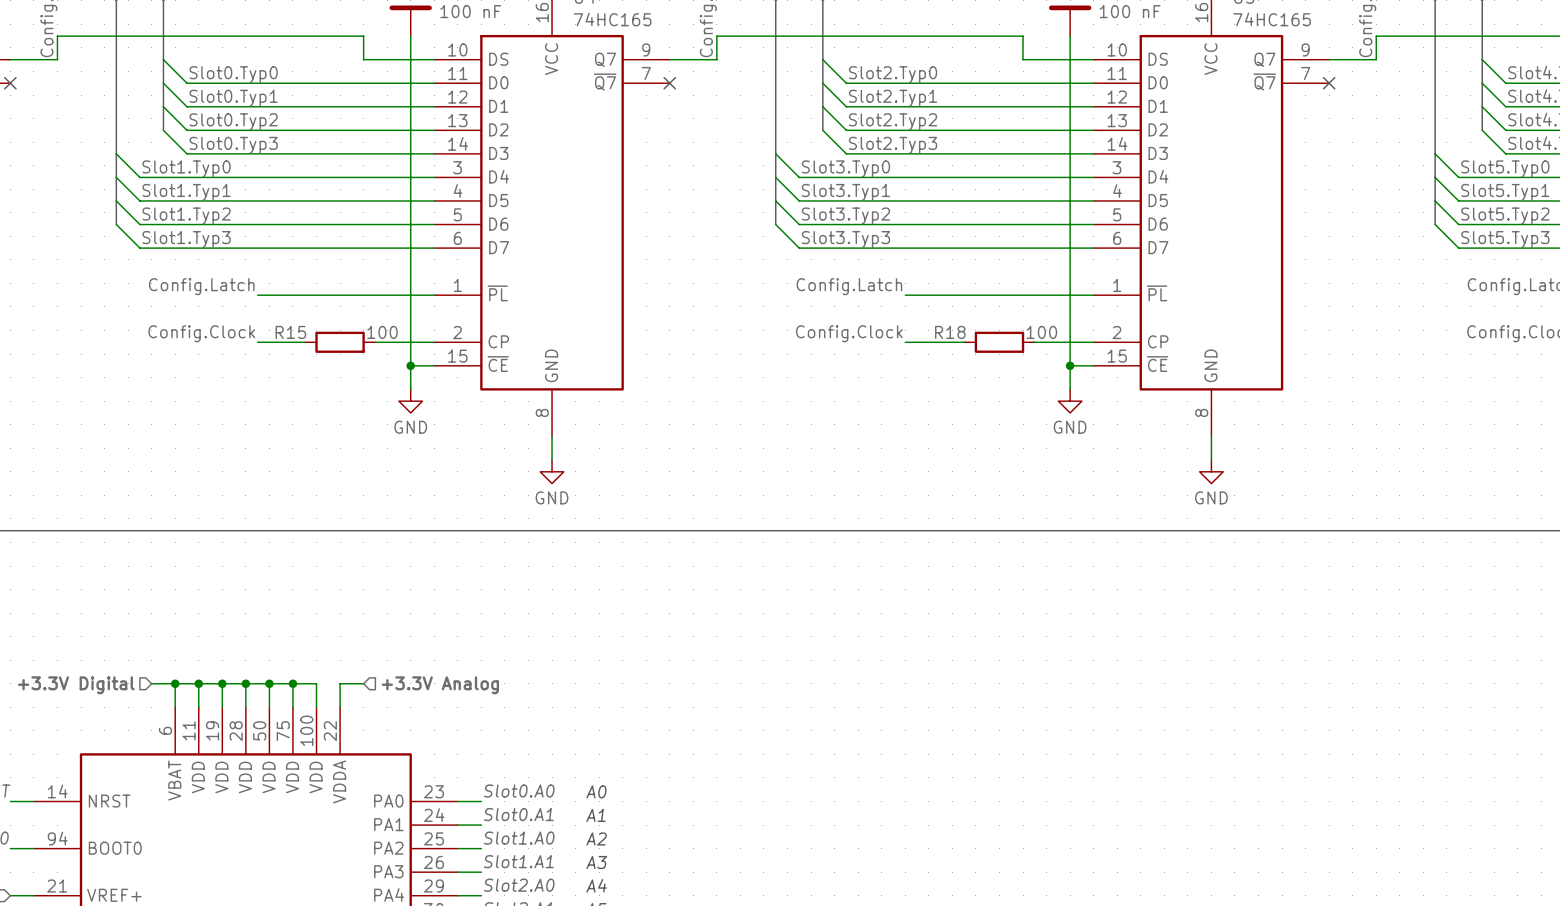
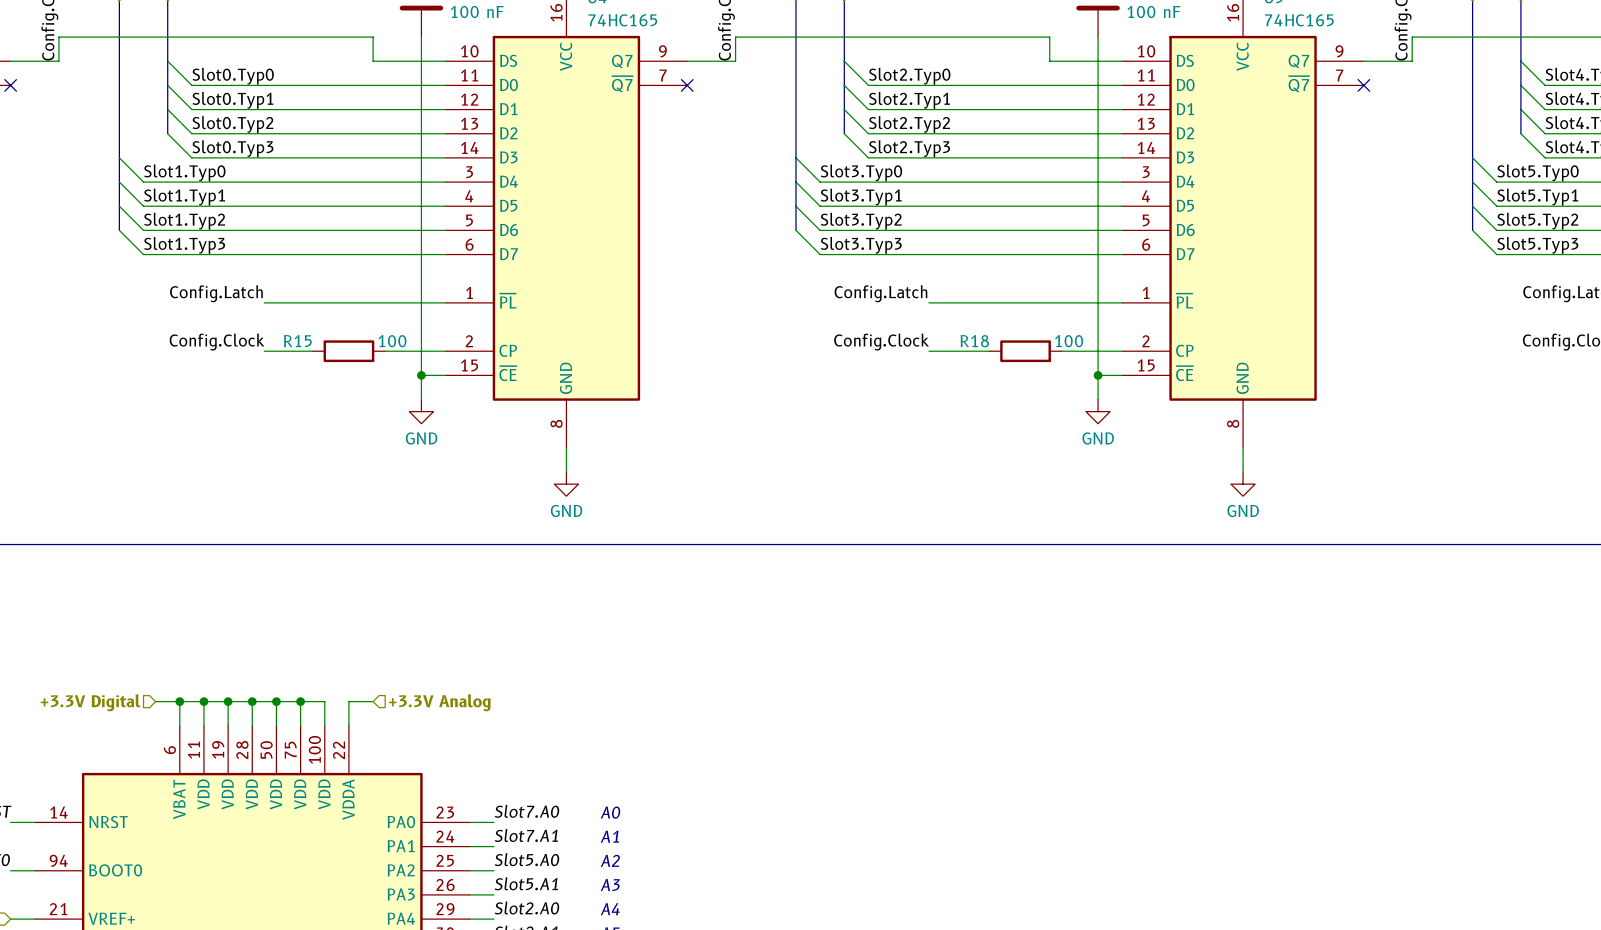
label: Slot0.A0 (519, 791) -> Slot7.A0 (526, 811)
label: Slot0.A1 (518, 814) -> Slot7.A1 (526, 835)
label: Slot1.A0 (519, 838) -> Slot5.A0 (526, 859)
label: Slot1.A1 (518, 861) -> Slot5.A1 (526, 883)

